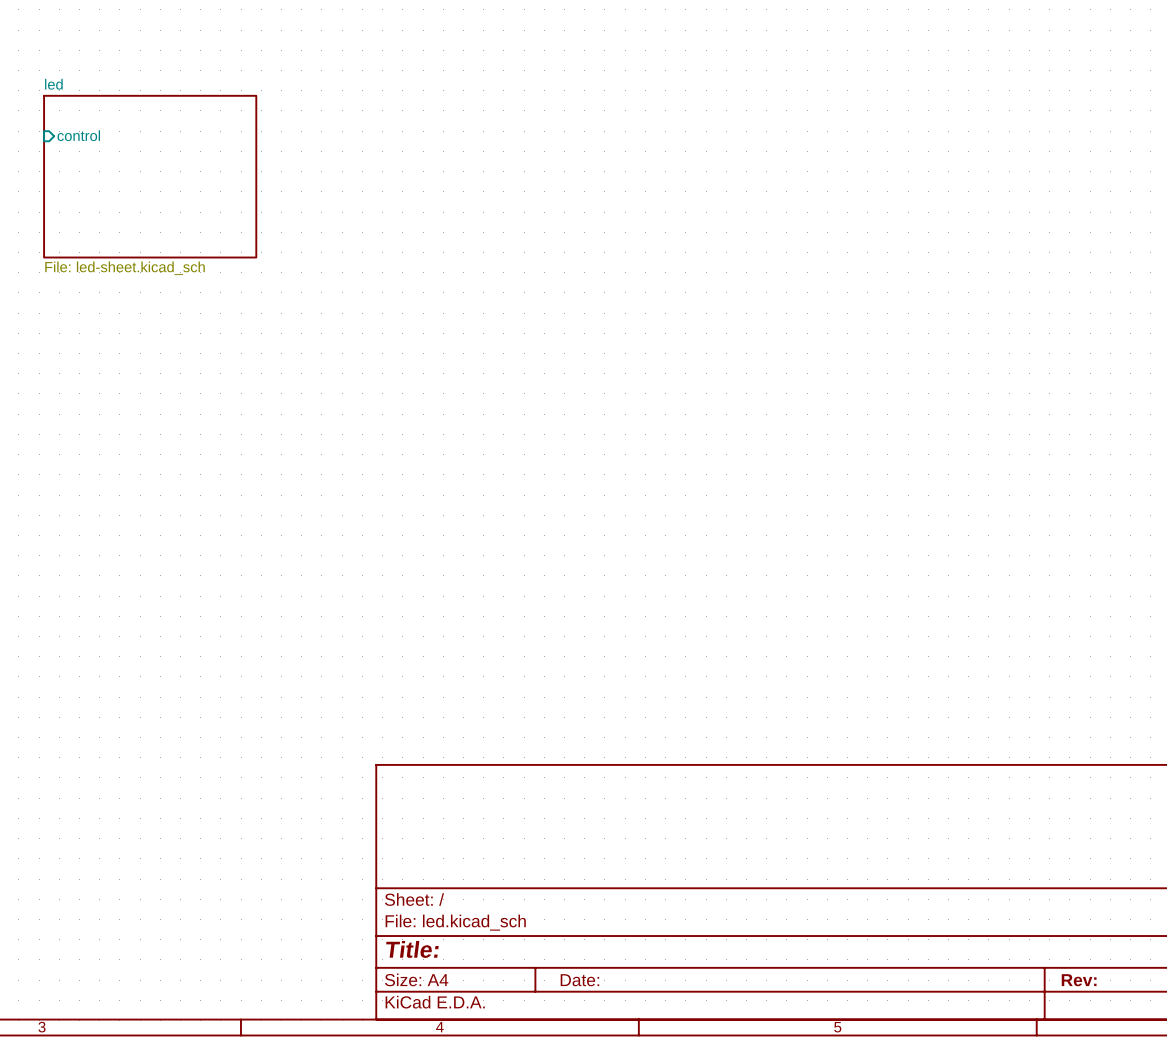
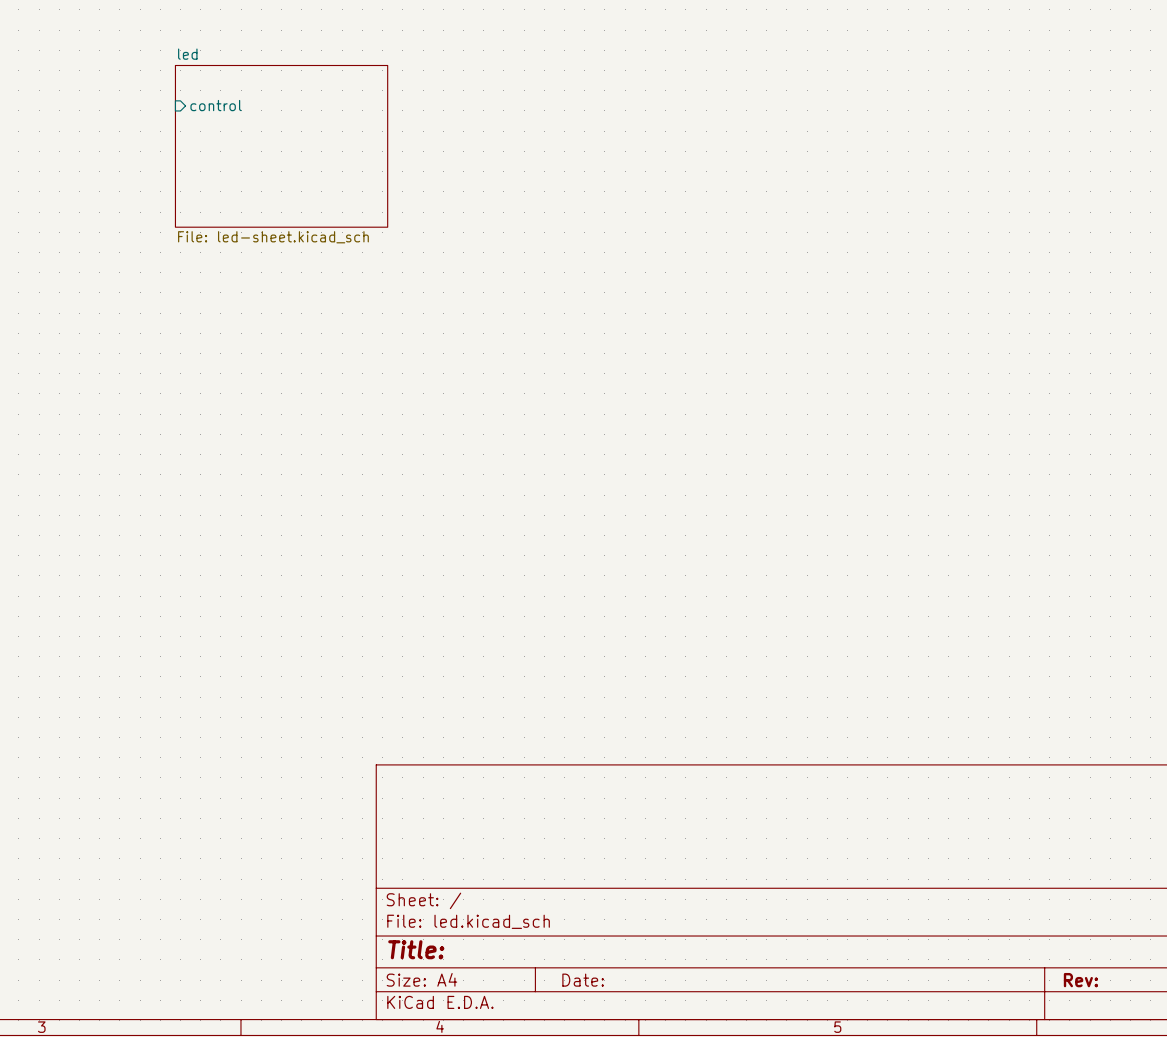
sheet pin position: control (78, 135) -> control (216, 105)
sheet led position: (150, 176) -> (281, 146)

